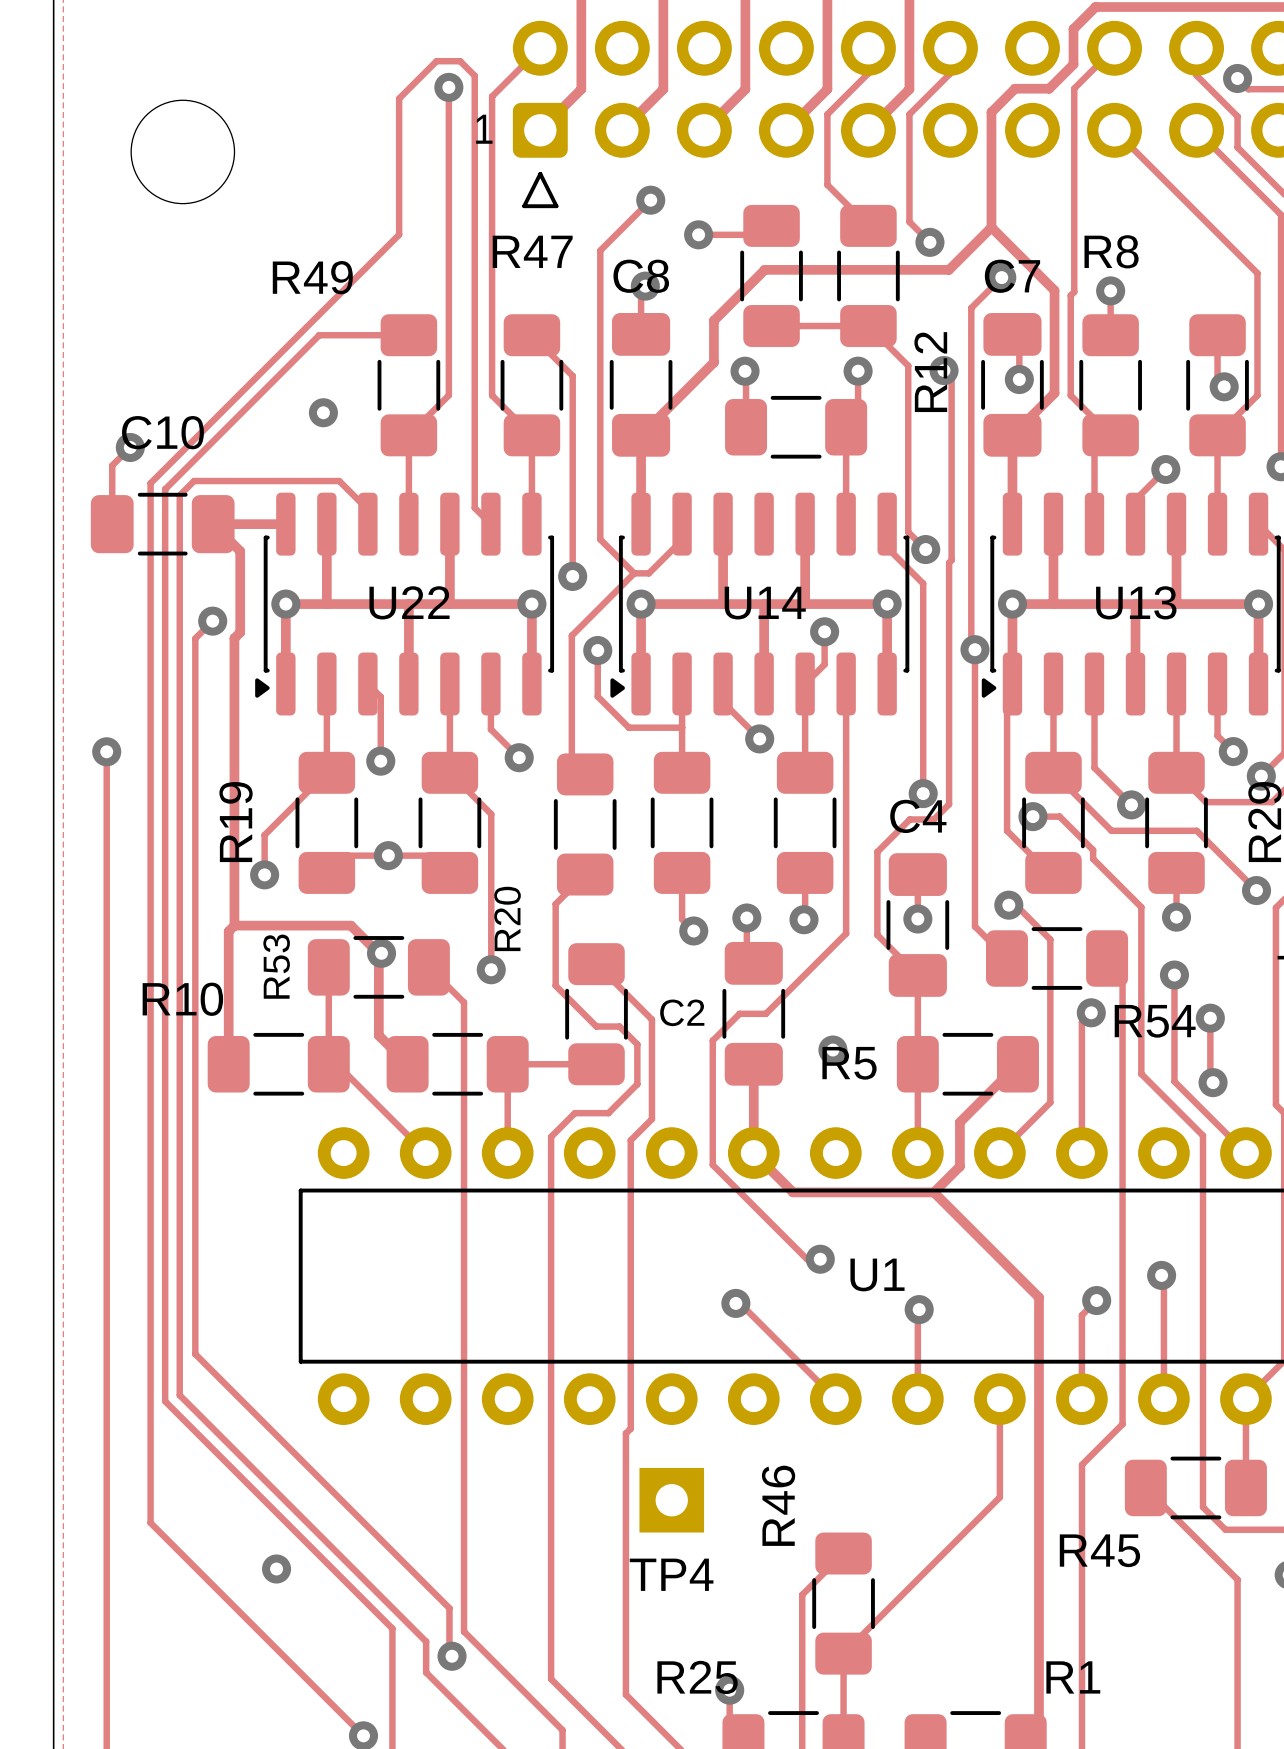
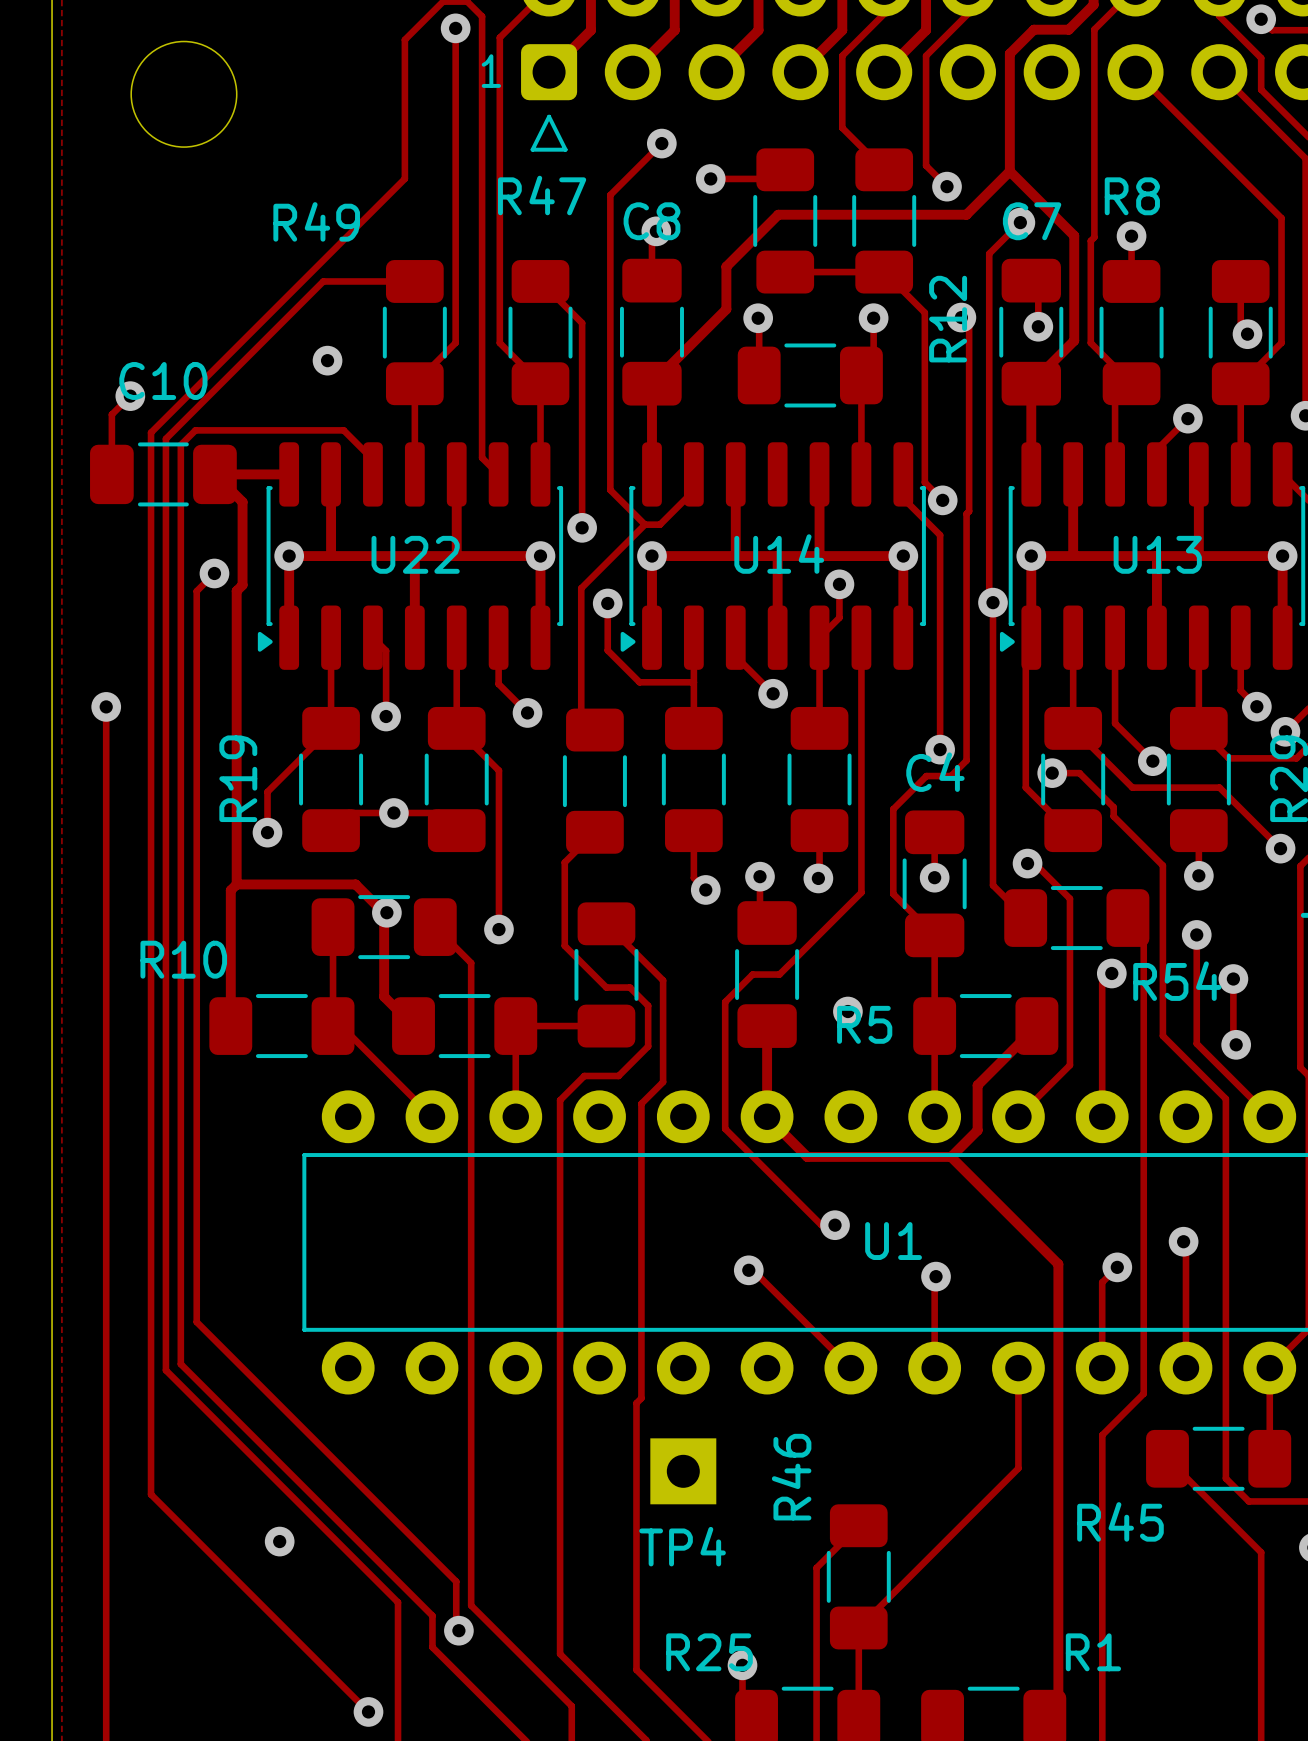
R20 name: R20 (507, 918) -> none
R53 name: R53 (276, 966) -> none
C2 name: C2 (682, 1012) -> none

